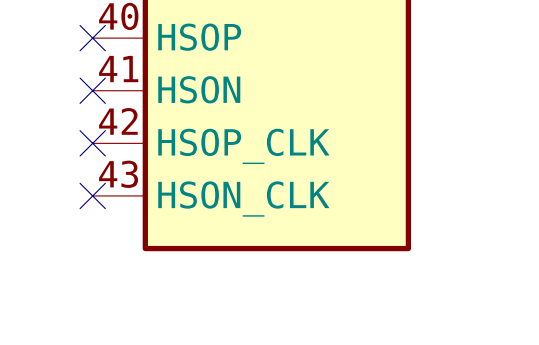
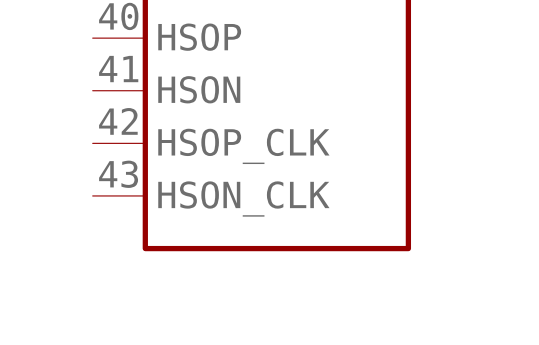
no-connect mark: (92, 38) -> none
no-connect mark: (92, 90) -> none
no-connect mark: (92, 143) -> none
no-connect mark: (92, 195) -> none

